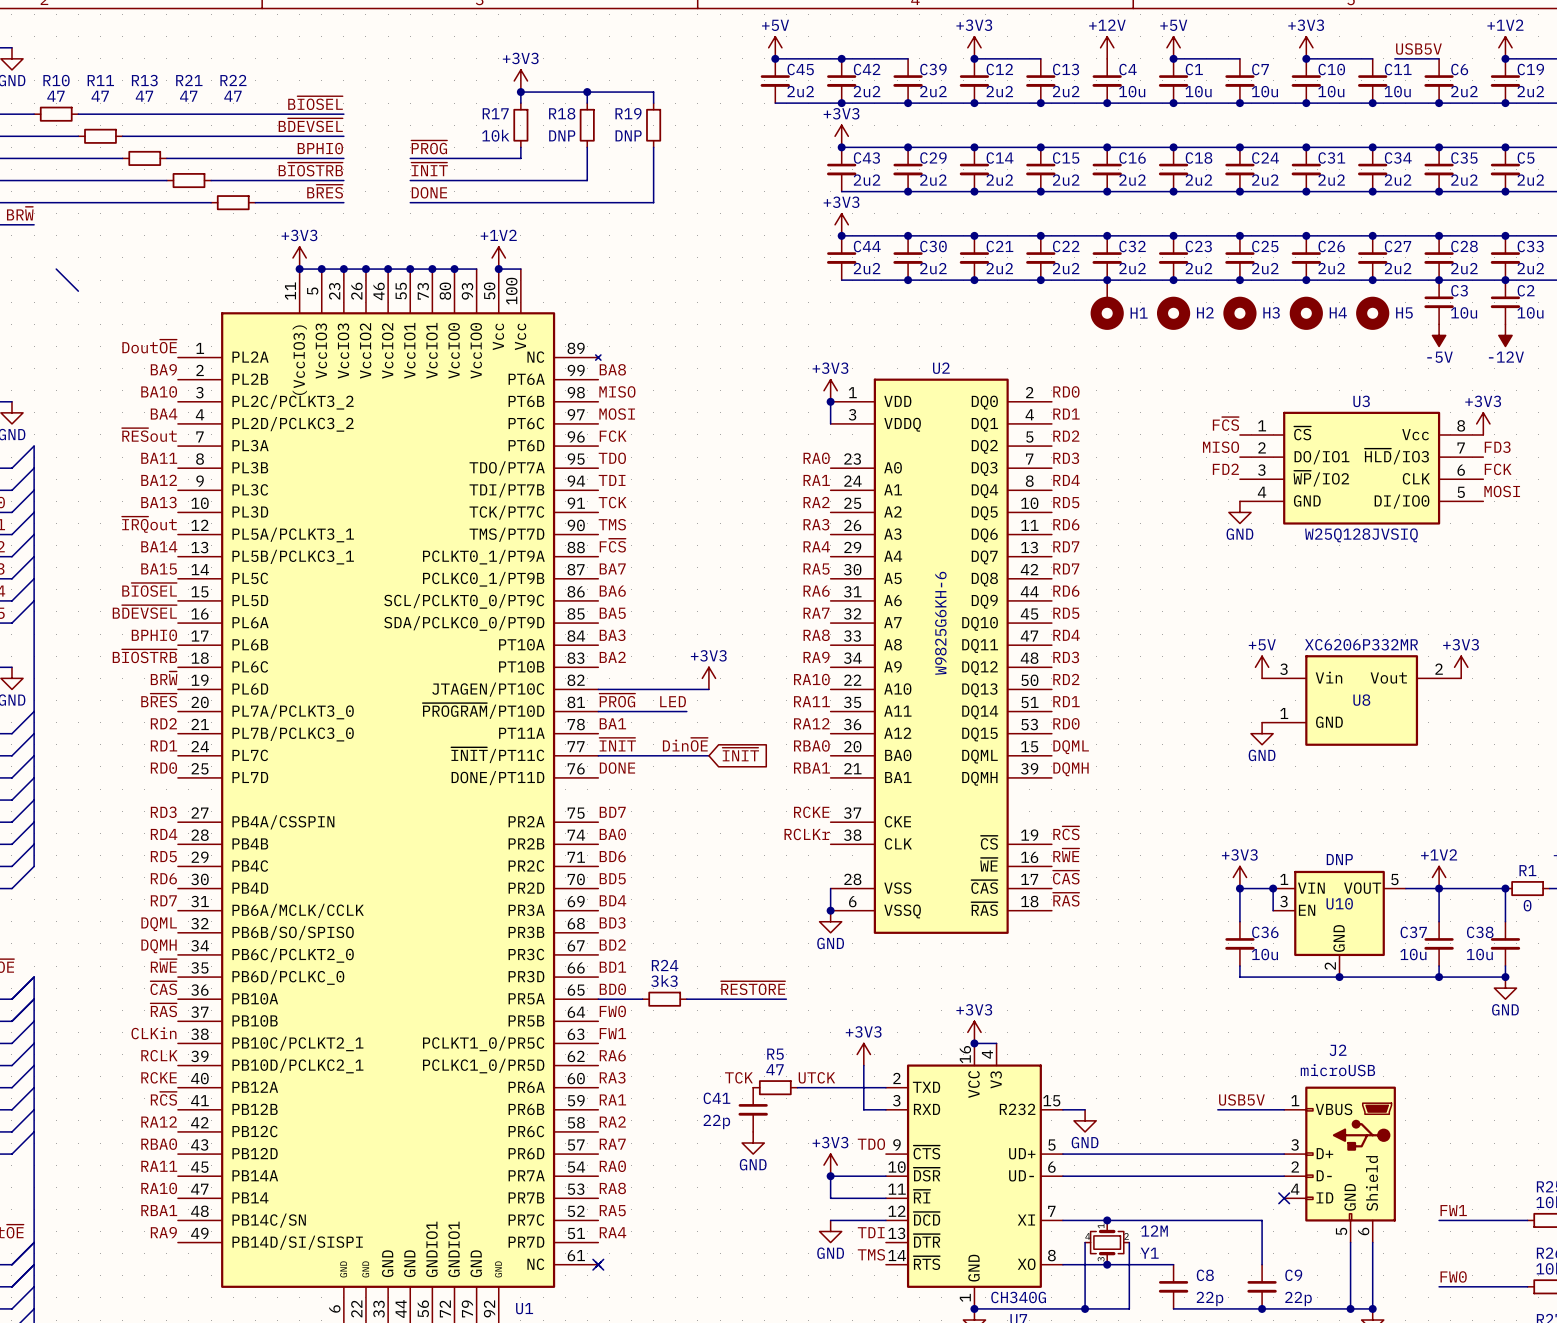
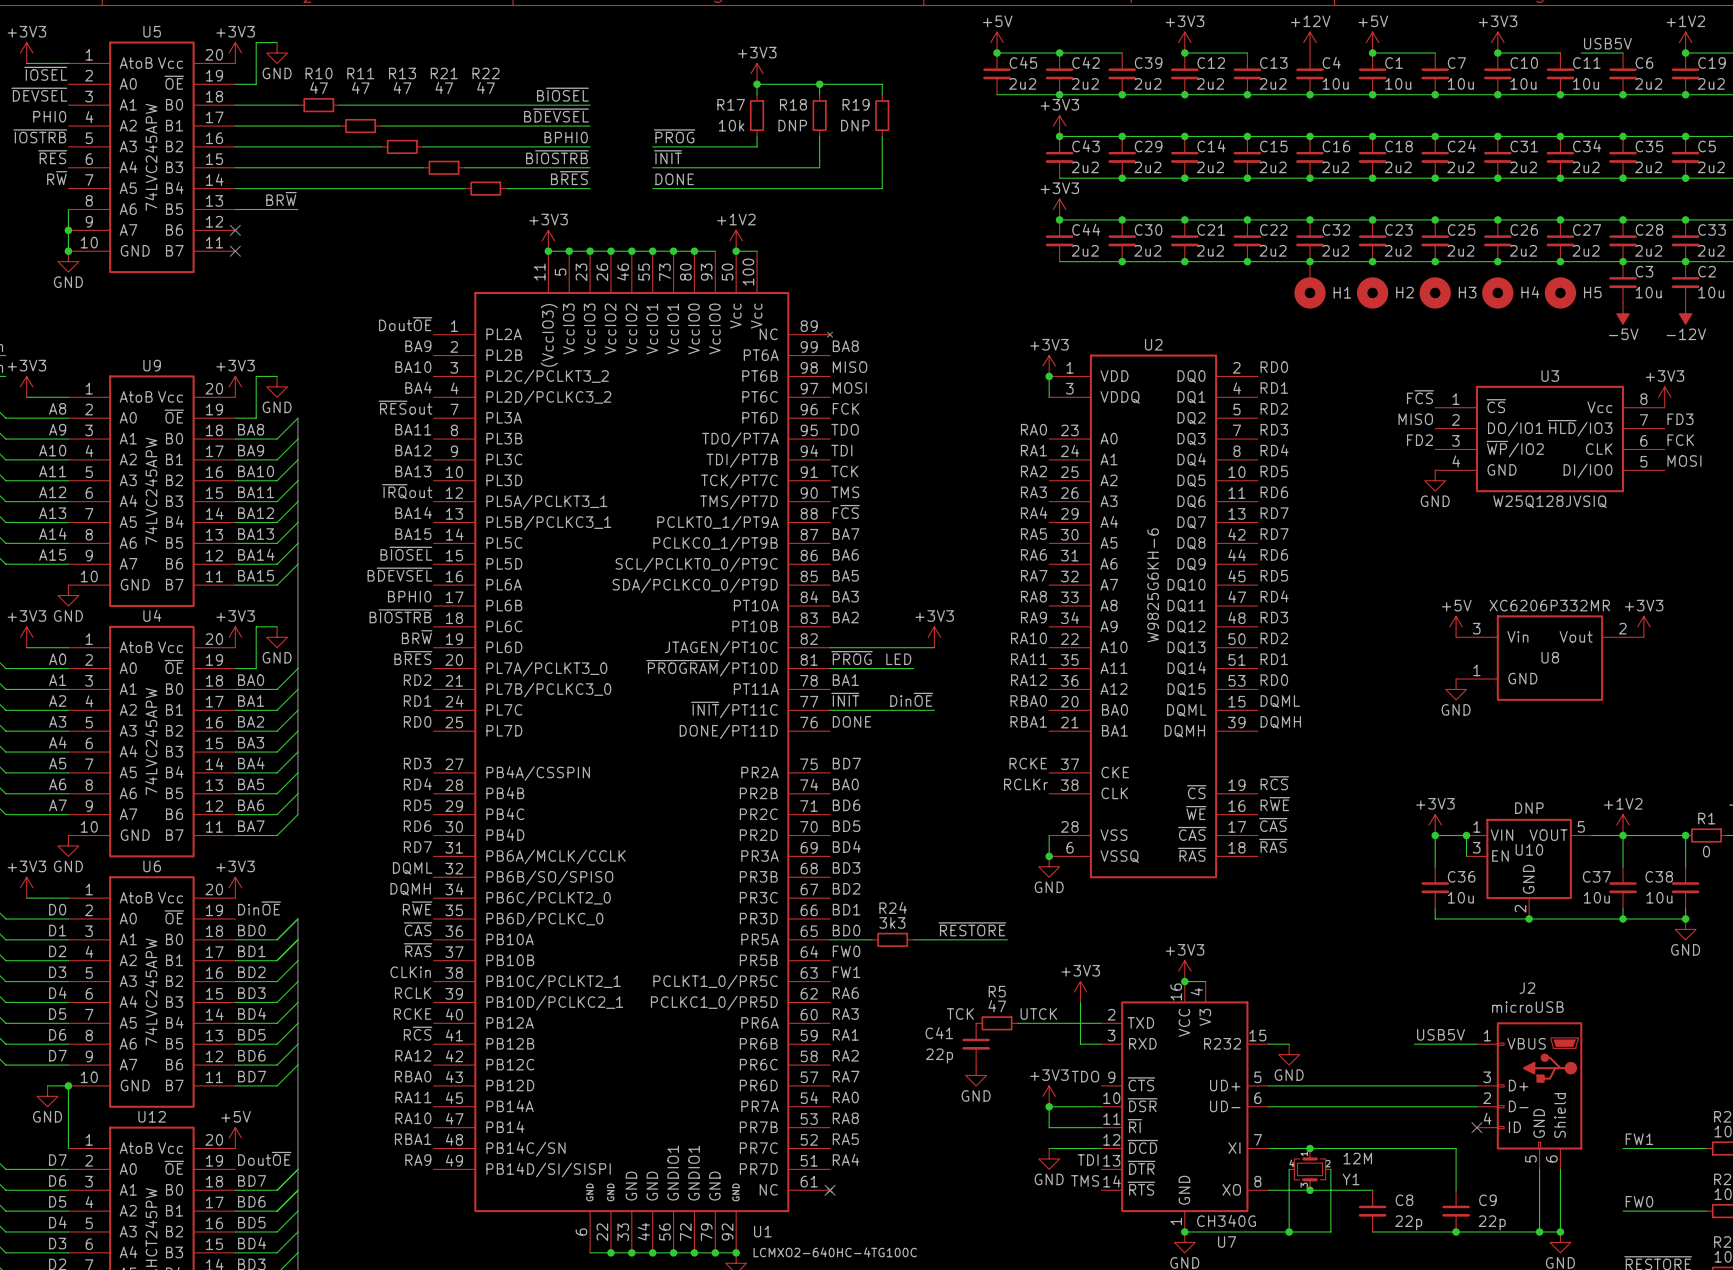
wire: (56, 269) (78, 291) -> none
global label: ~{INIT} (740, 754) -> none

